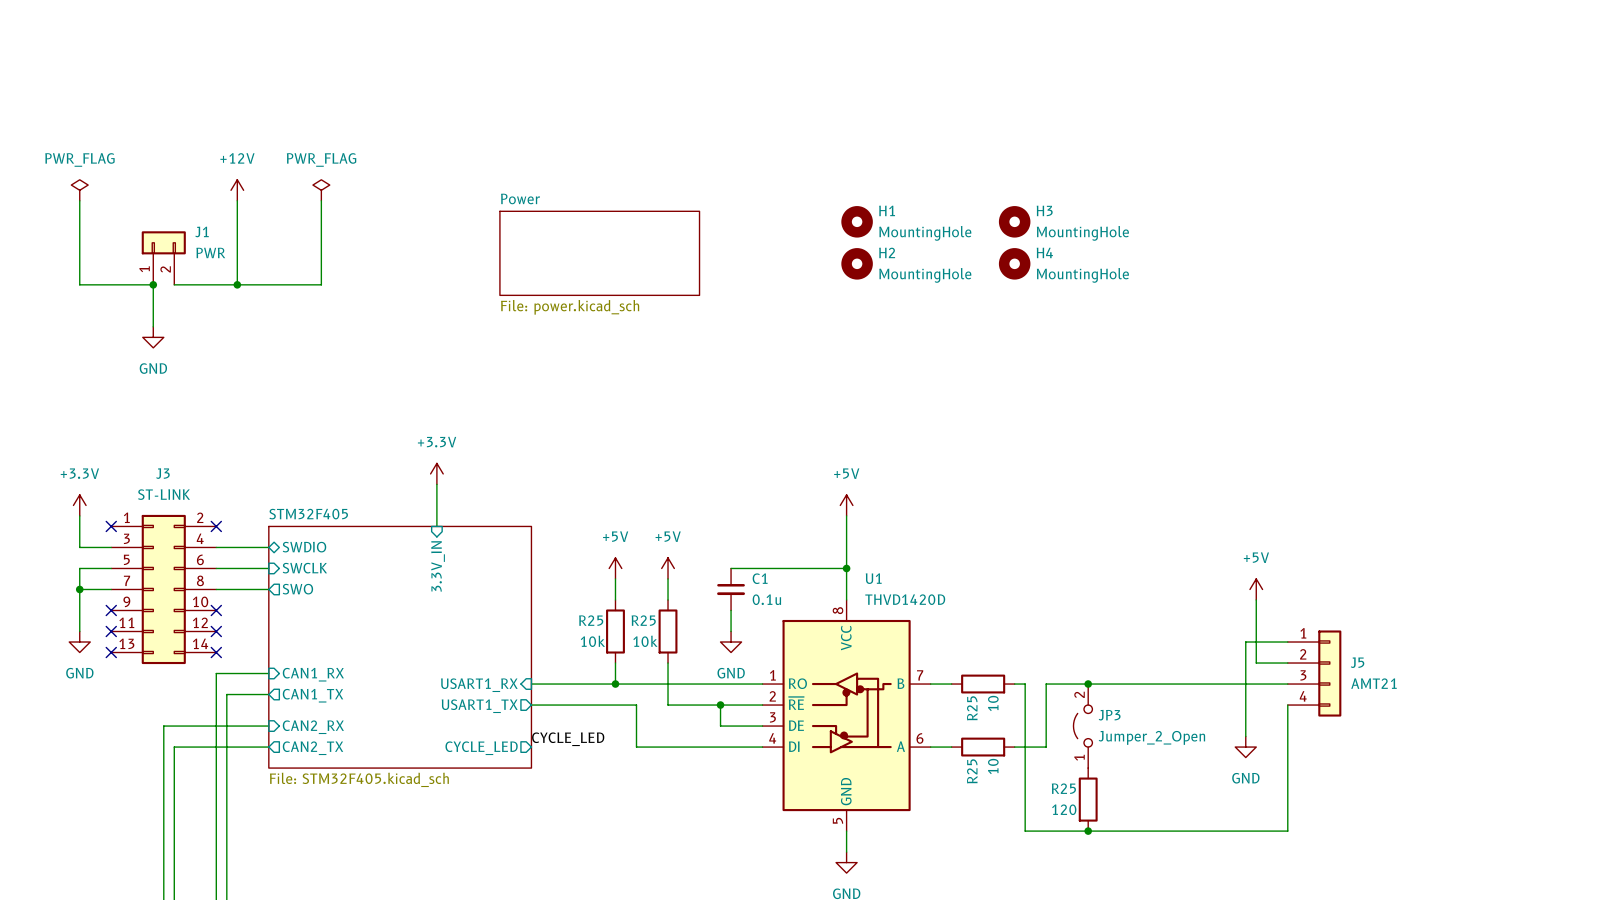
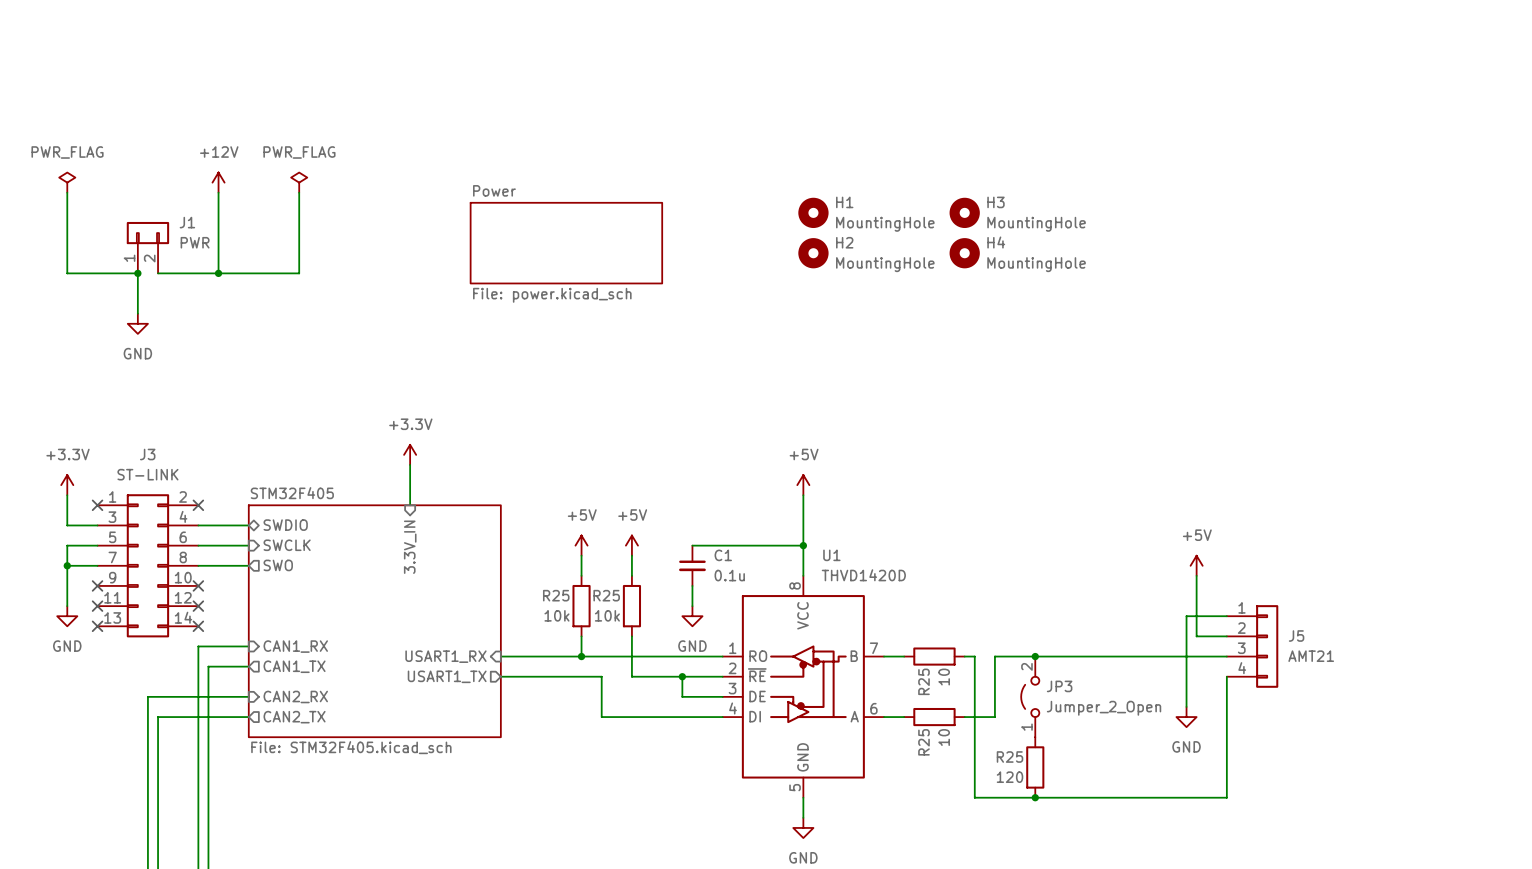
label: CYCLE_LED (568, 739) -> none
sheet pin: CYCLE_LED (481, 748) -> none

